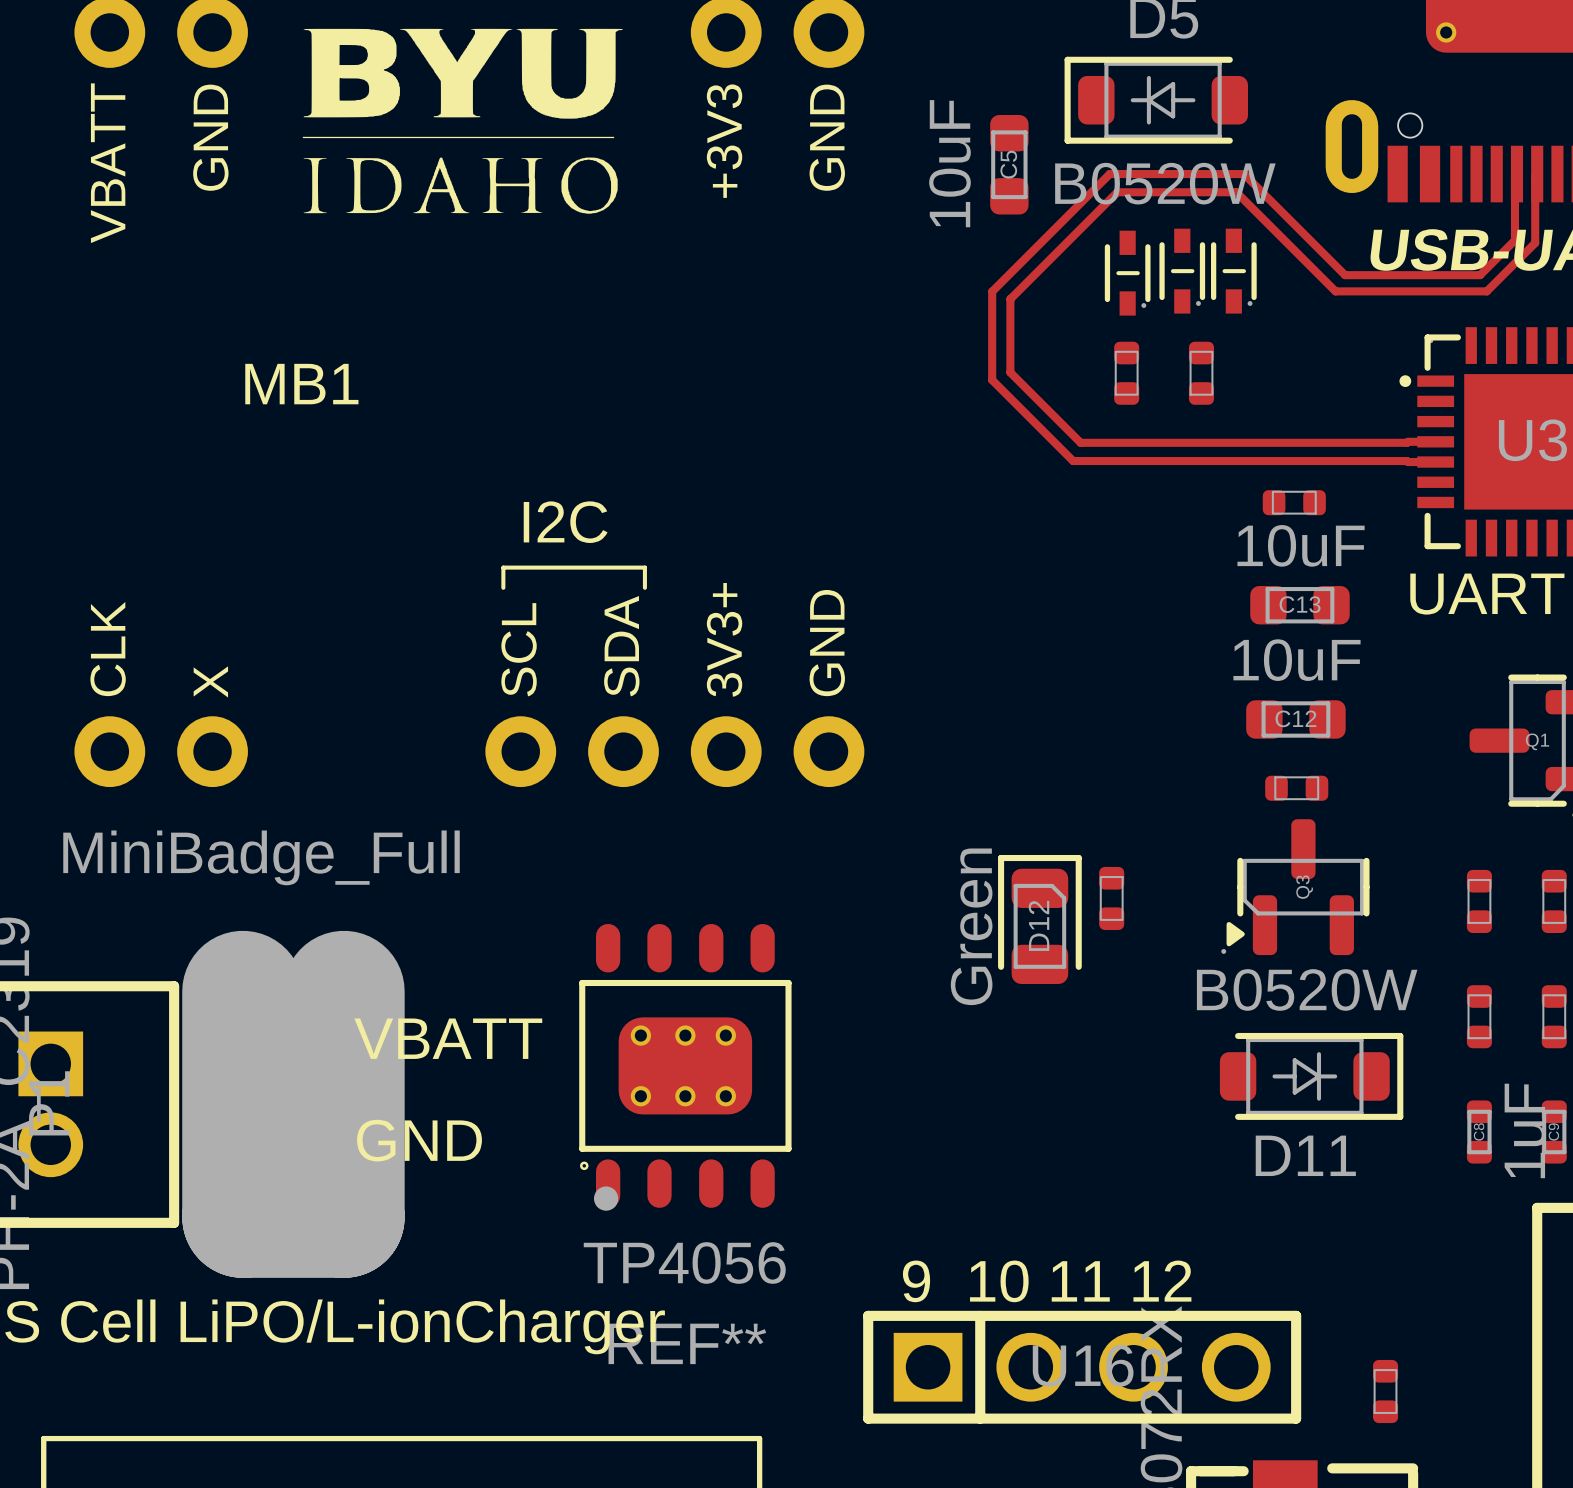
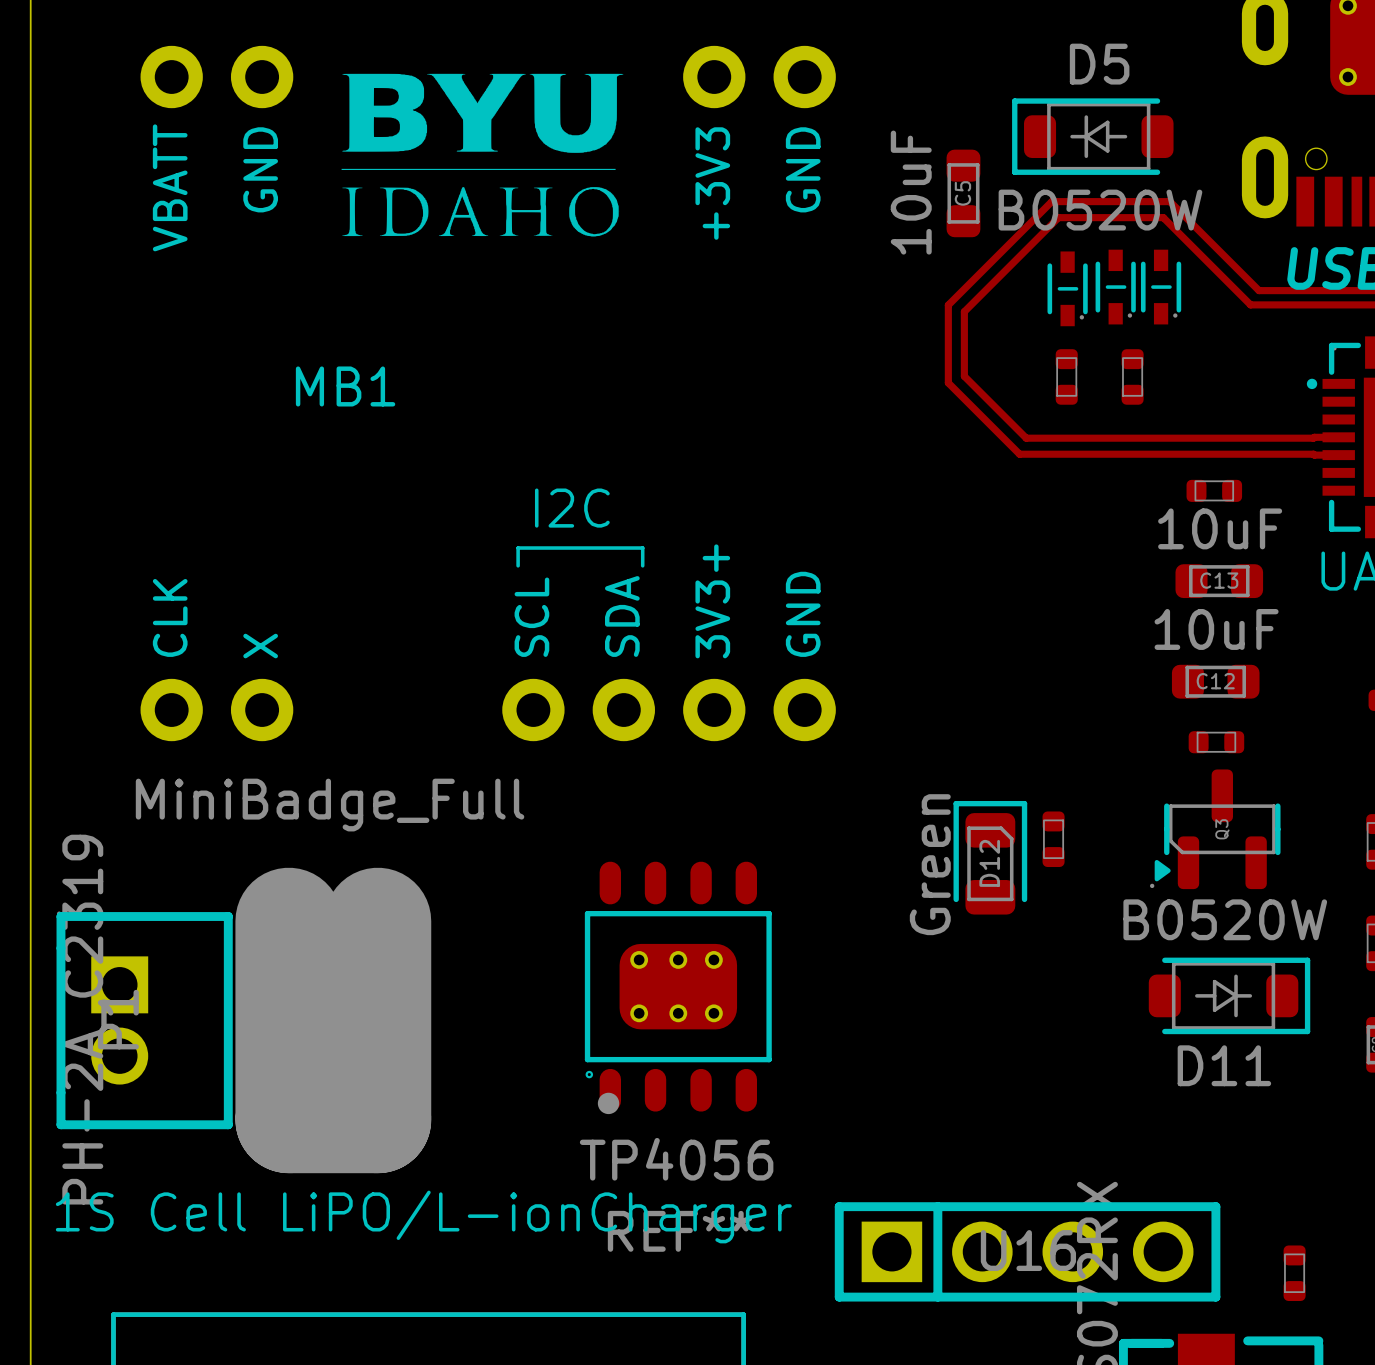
text: VBATT (448, 1038) -> none
text: GND (419, 1140) -> none
text: 9 10 11 12 (1047, 1281) -> none

